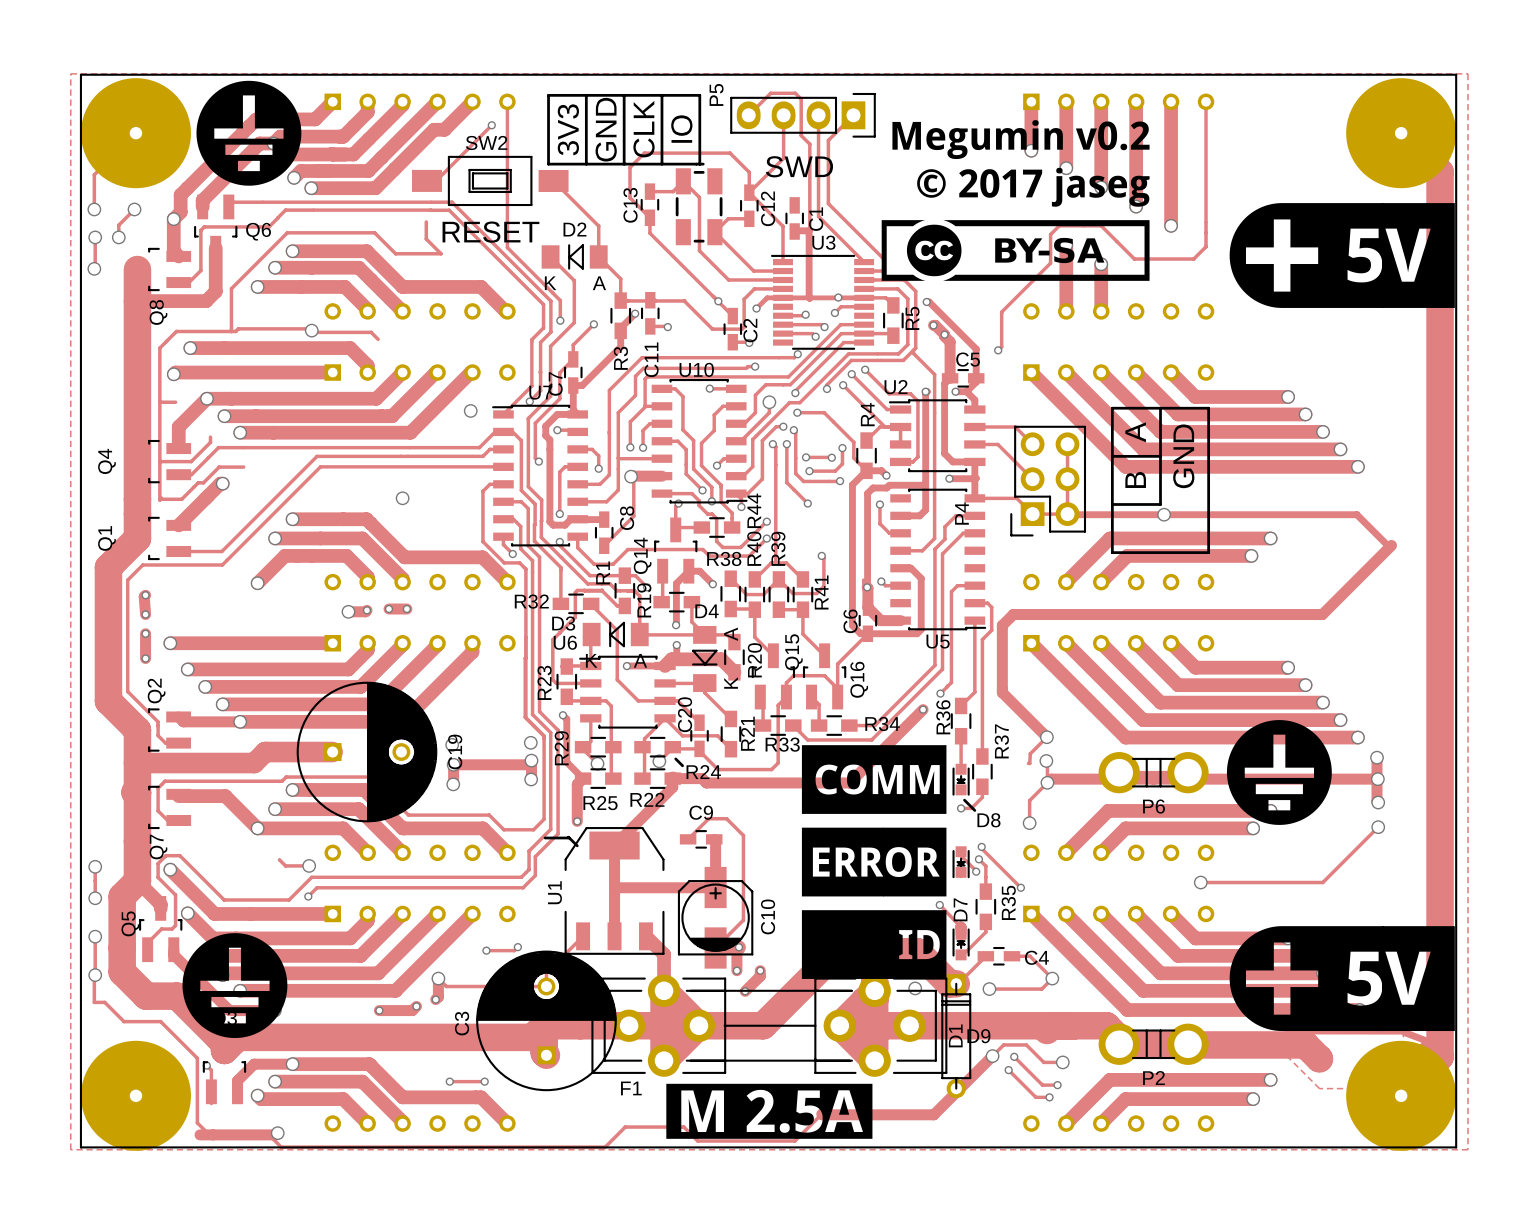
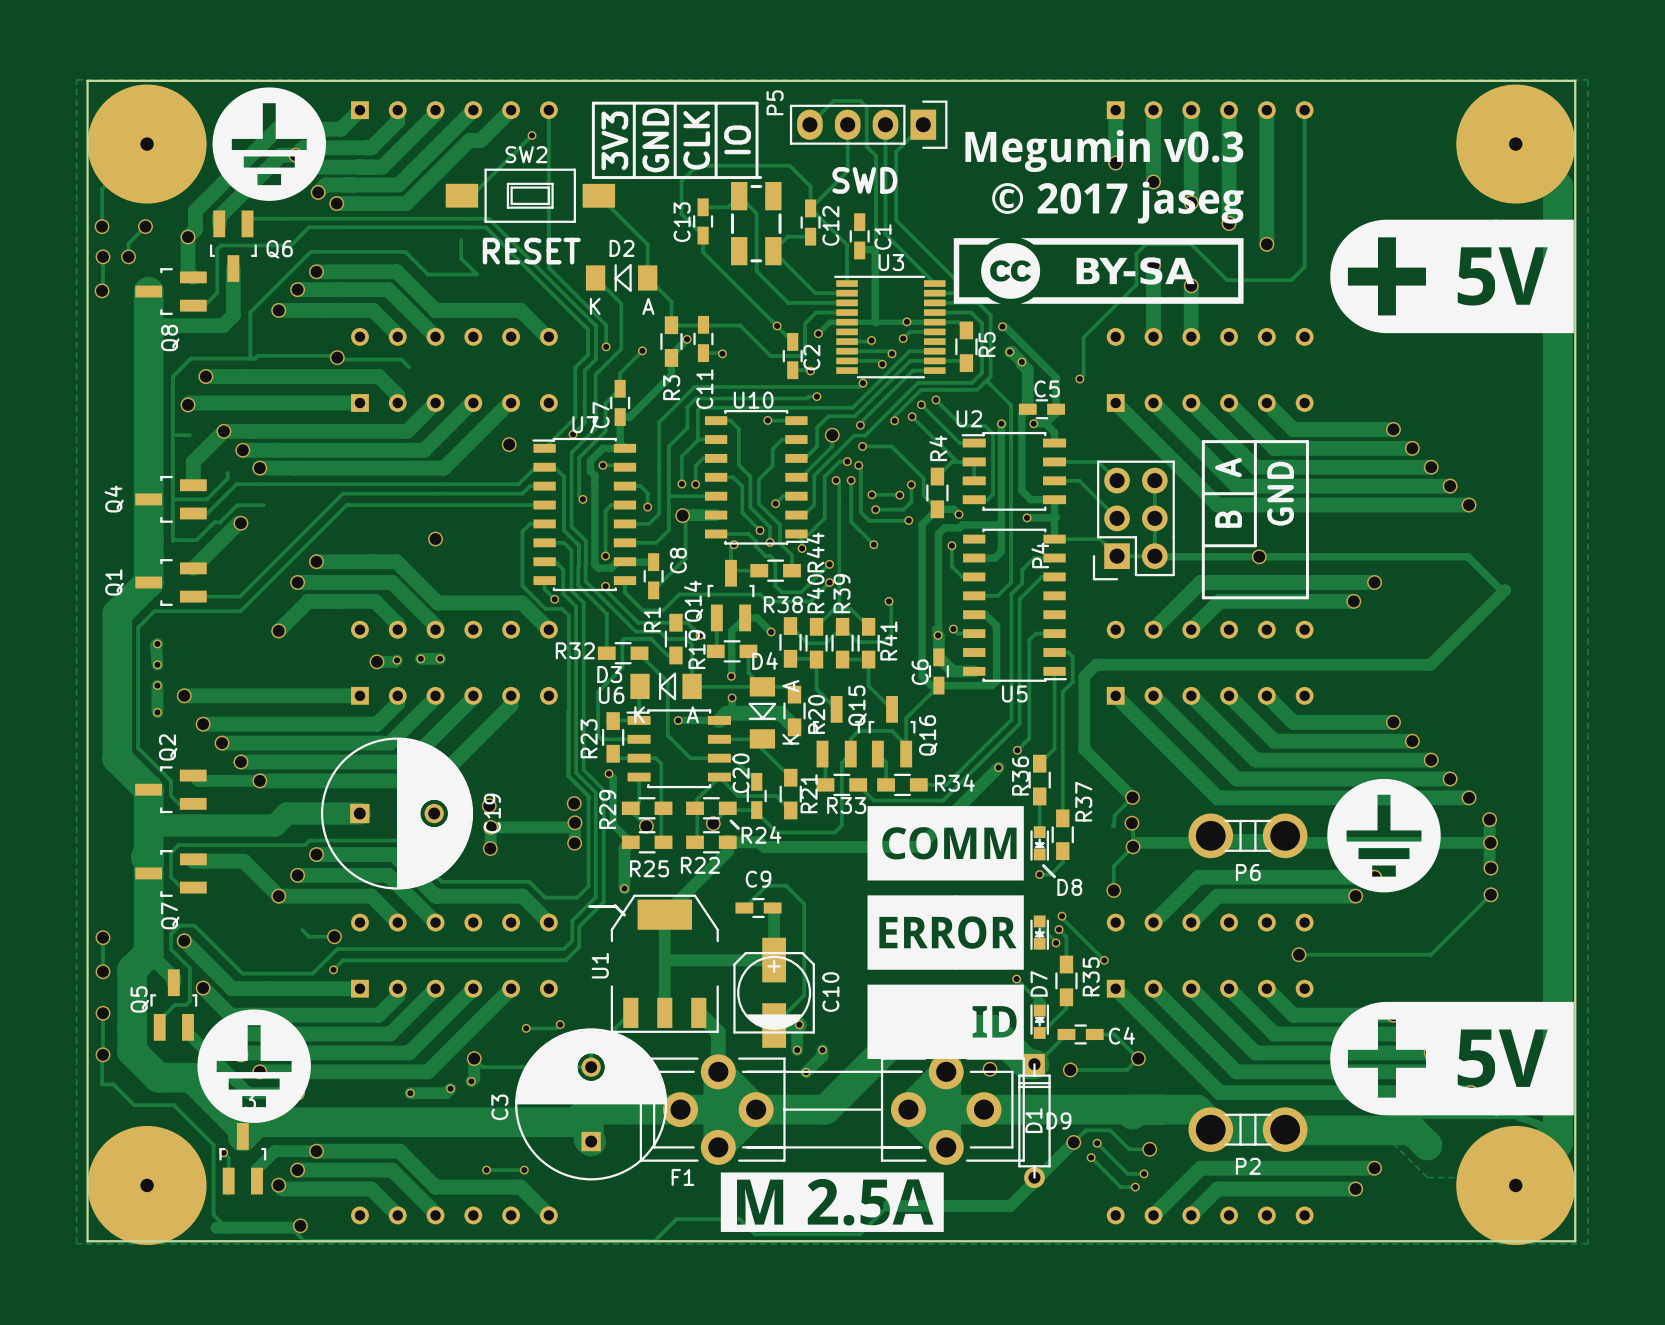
drawing shape: [881, 120, 1150, 281] -> [953, 129, 1244, 304]

